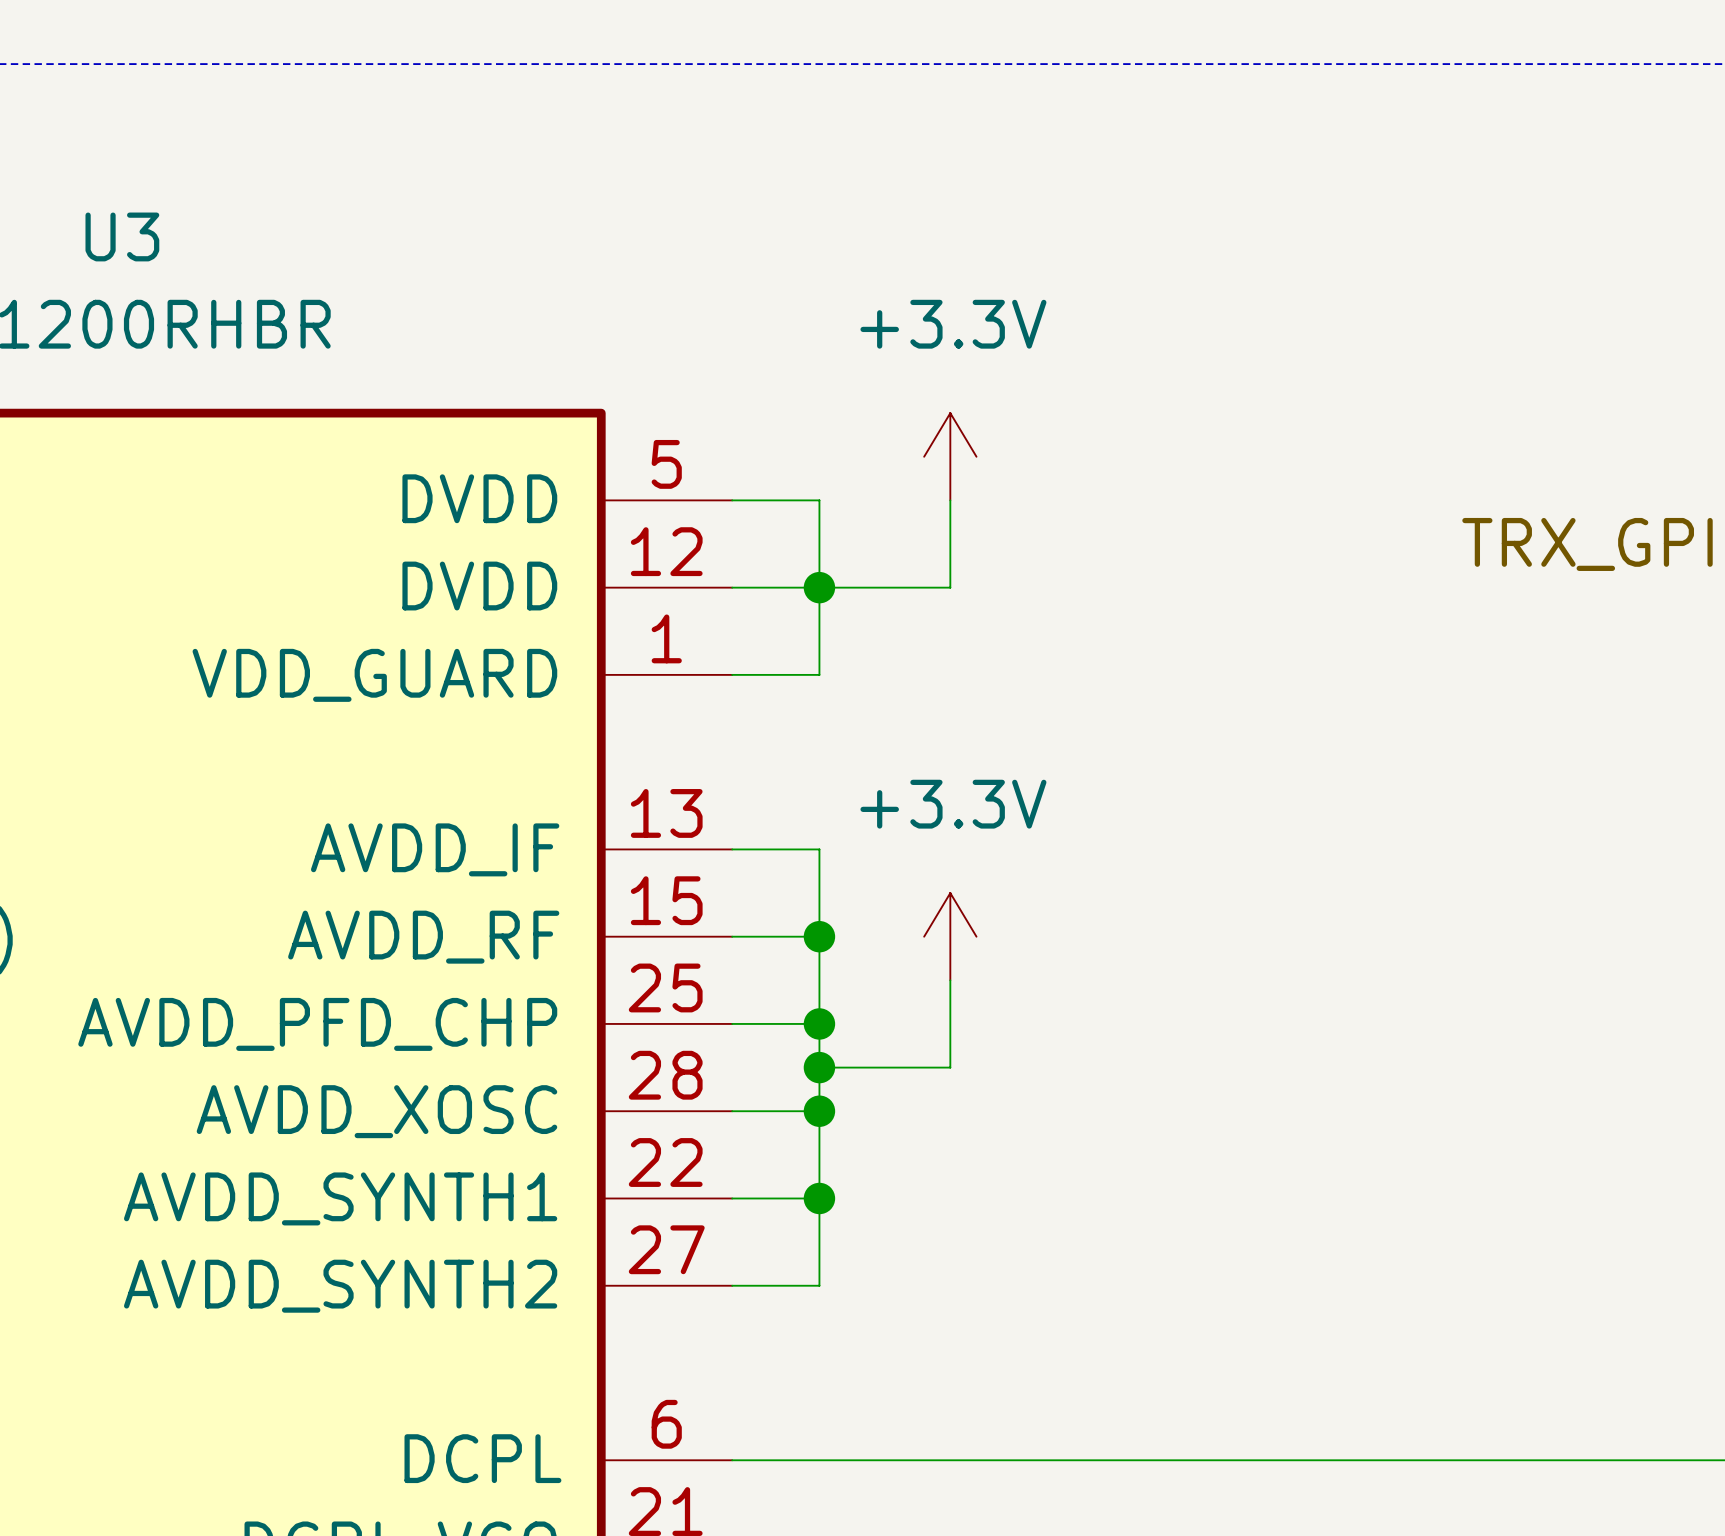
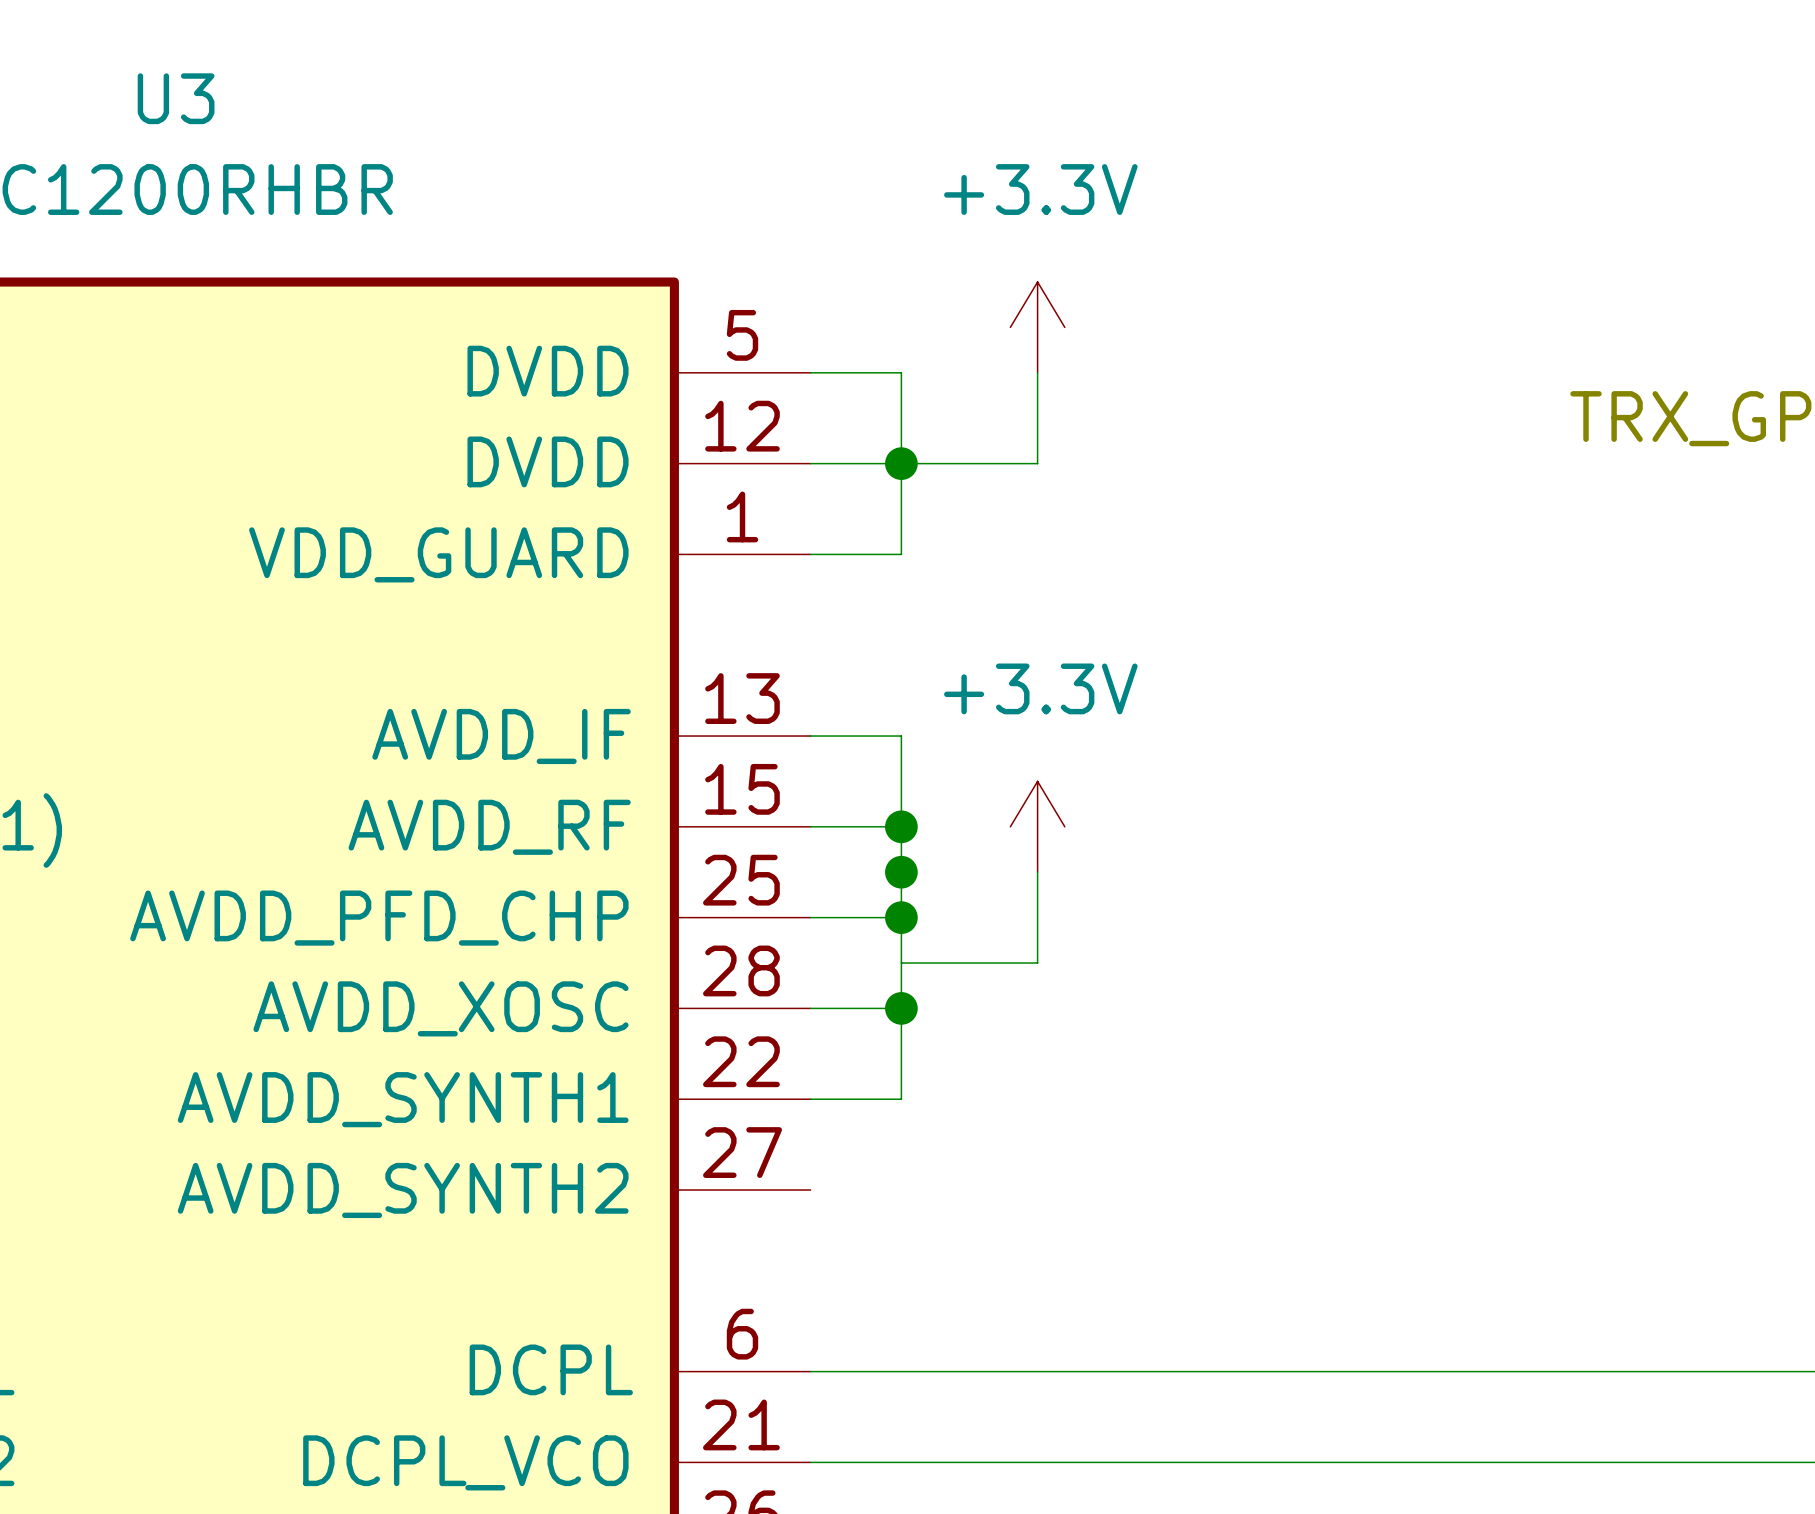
junction position: (819, 1067) -> (901, 872)
wire: (819, 1198) (819, 1285) (732, 1285) -> none
junction: (819, 1198) -> none

